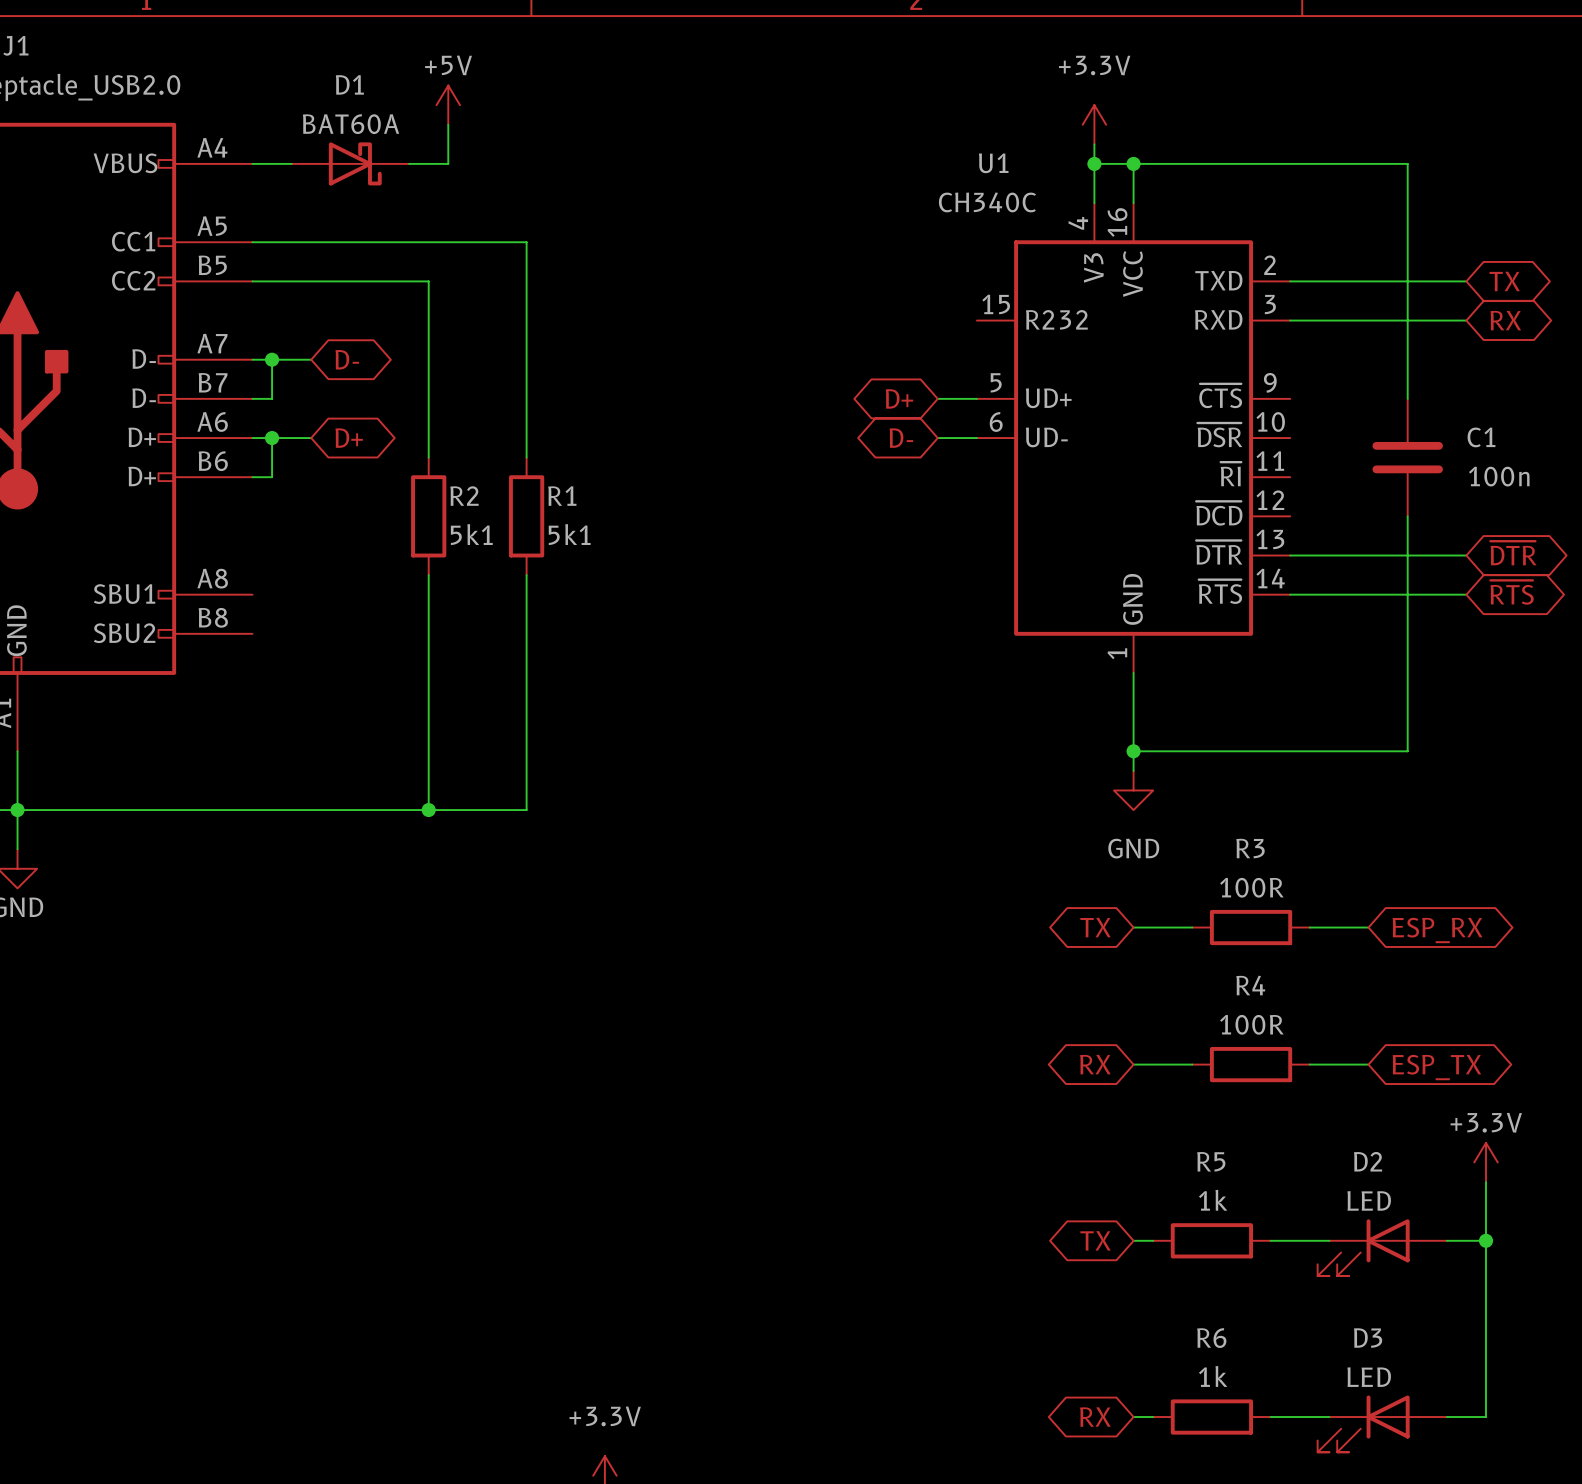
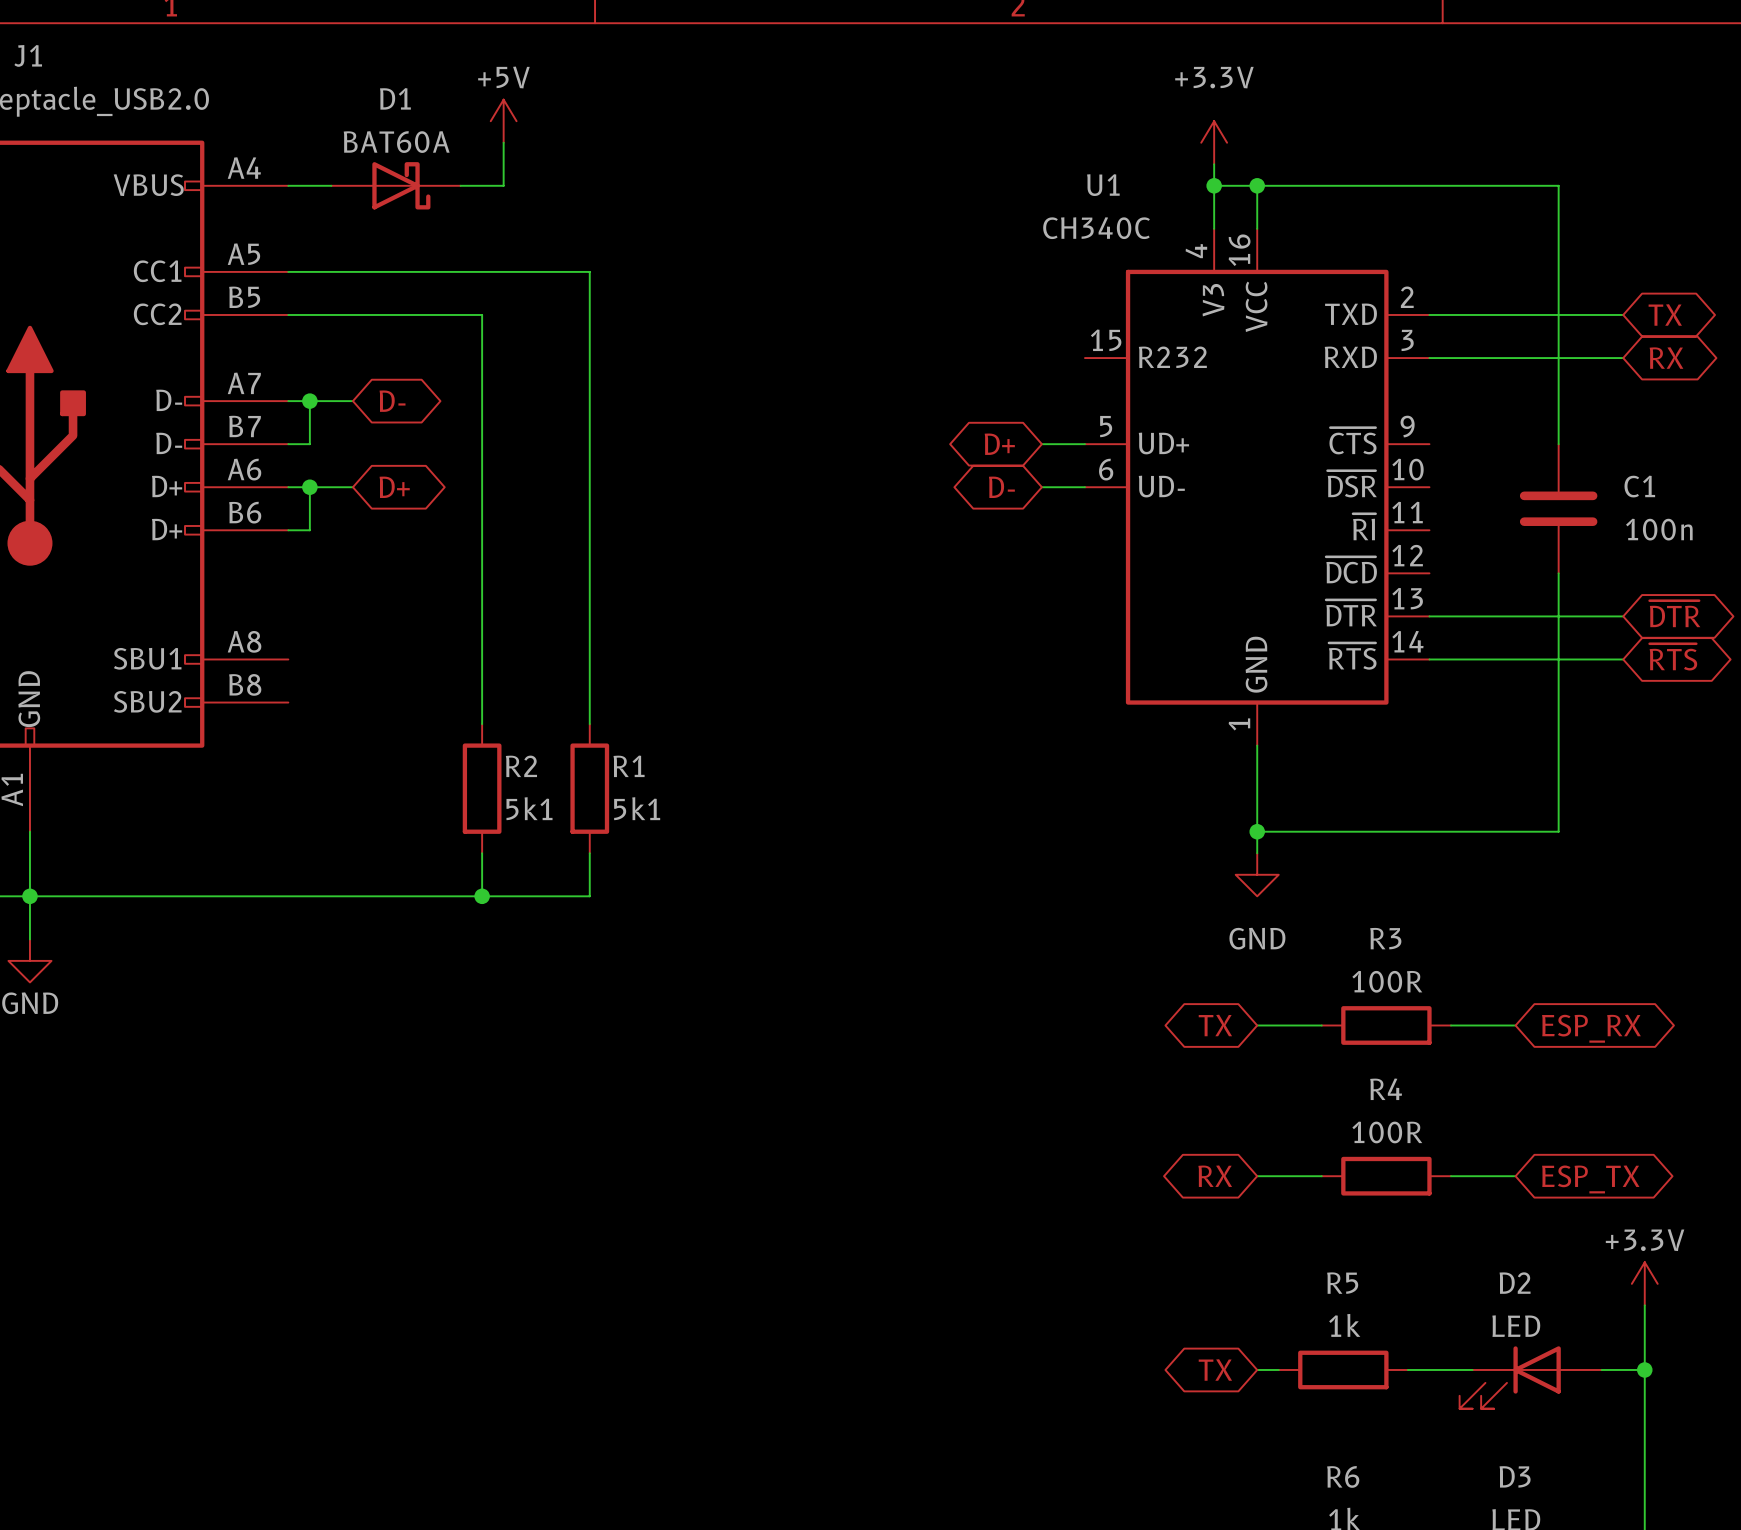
R2 position: (428, 516) -> (482, 788)
R1 position: (526, 516) -> (589, 788)
wire: (428, 653) (428, 770) -> (482, 508) (482, 637)
wire: (526, 653) (526, 770) -> (589, 508) (589, 637)

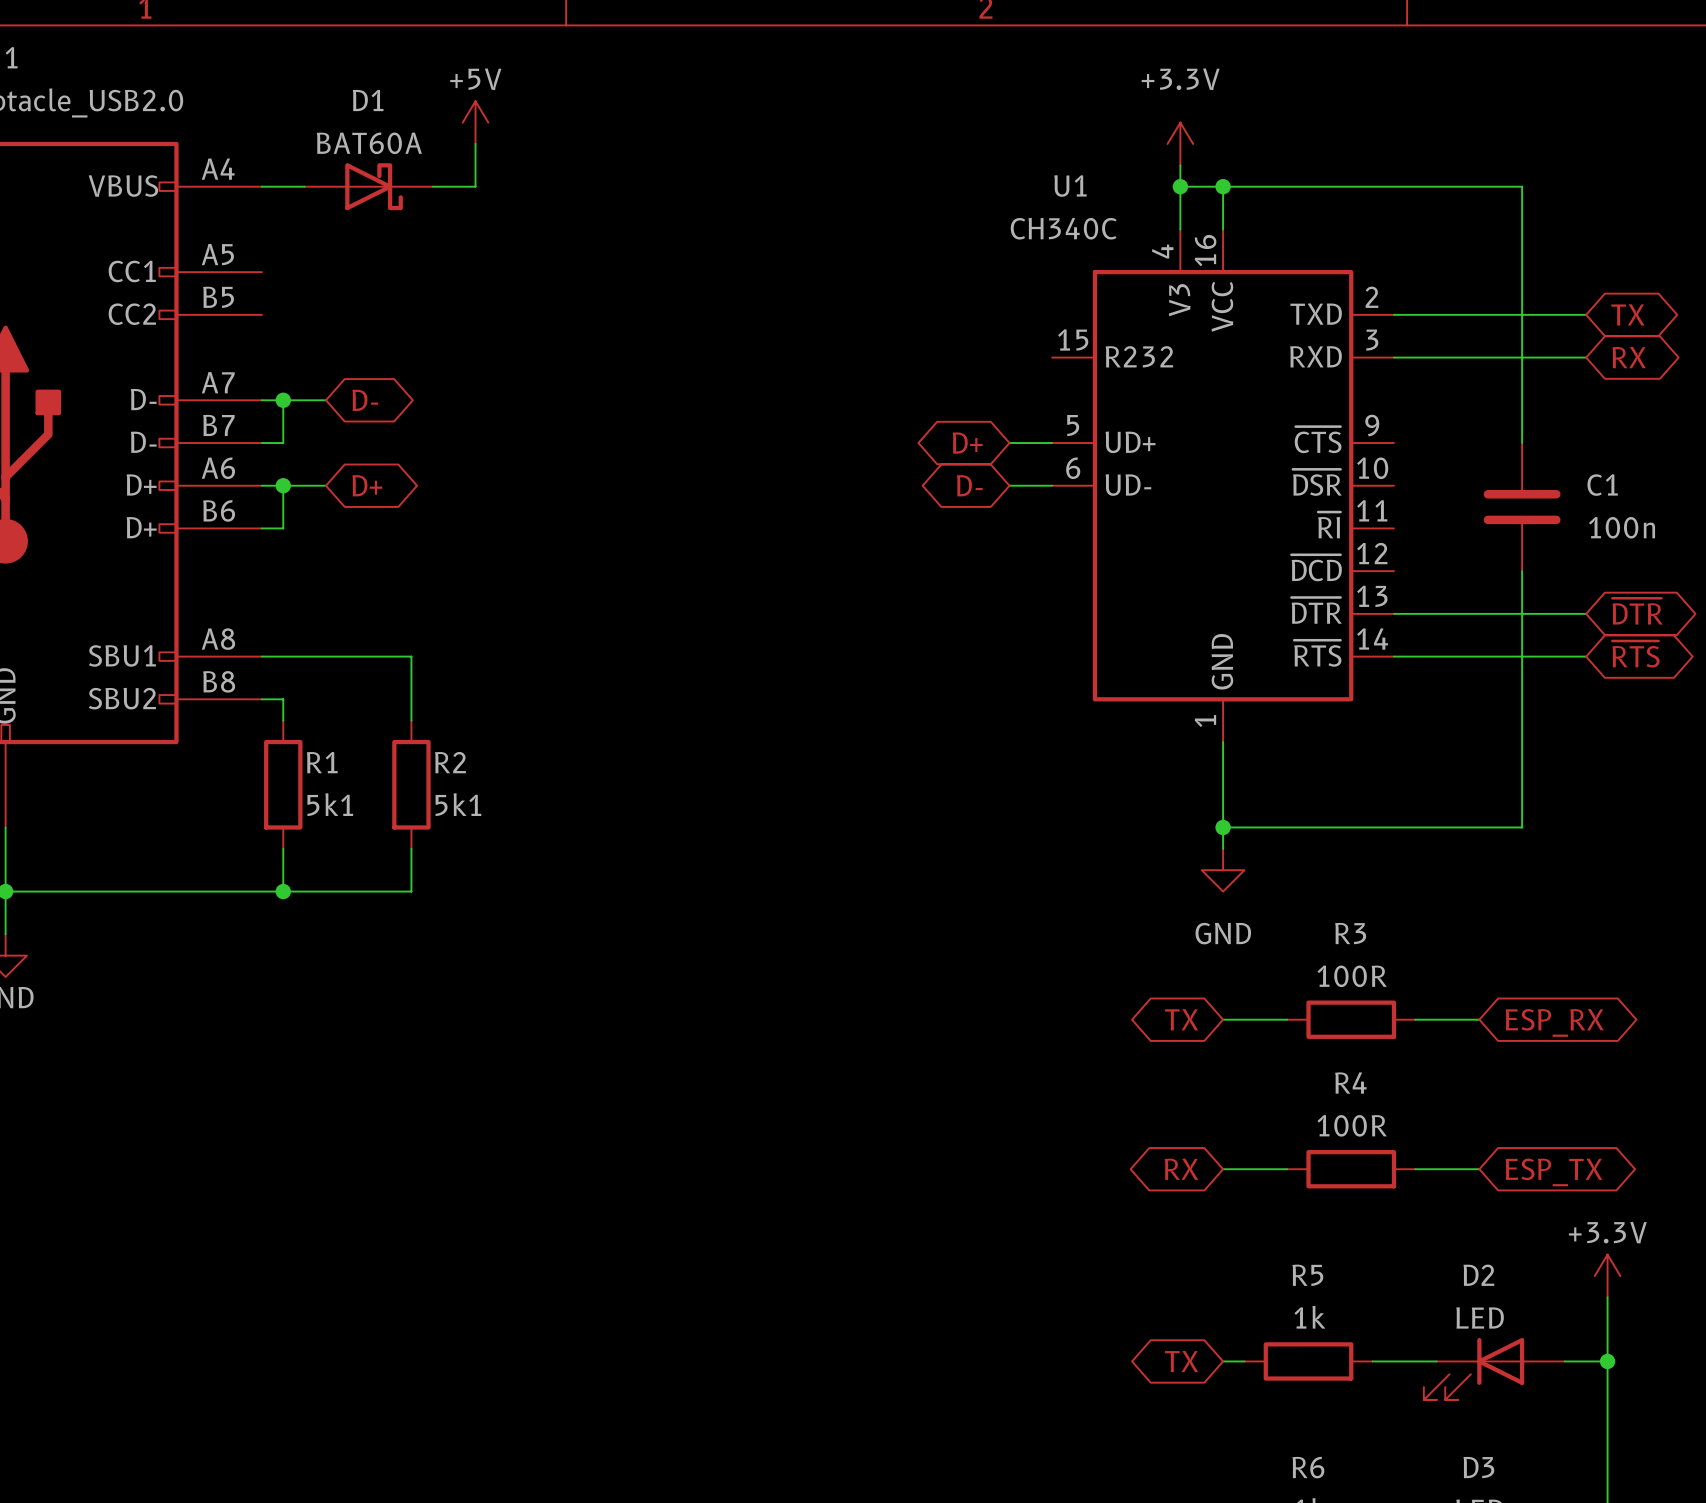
wire: (288, 271) (589, 271) (589, 724) -> none
wire: (288, 314) (482, 314) (482, 724) -> none
wire: none -> (261, 656) (411, 656) (411, 720)
wire: none -> (261, 699) (283, 699) (283, 720)
R2 position: (482, 788) -> (411, 784)
R1 position: (589, 788) -> (283, 784)
wire: (482, 853) (482, 896) -> (283, 848) (283, 891)
wire: (589, 853) (589, 896) (439, 896) -> (411, 848) (411, 891)
junction: none -> (283, 891)
junction: (482, 896) -> none

